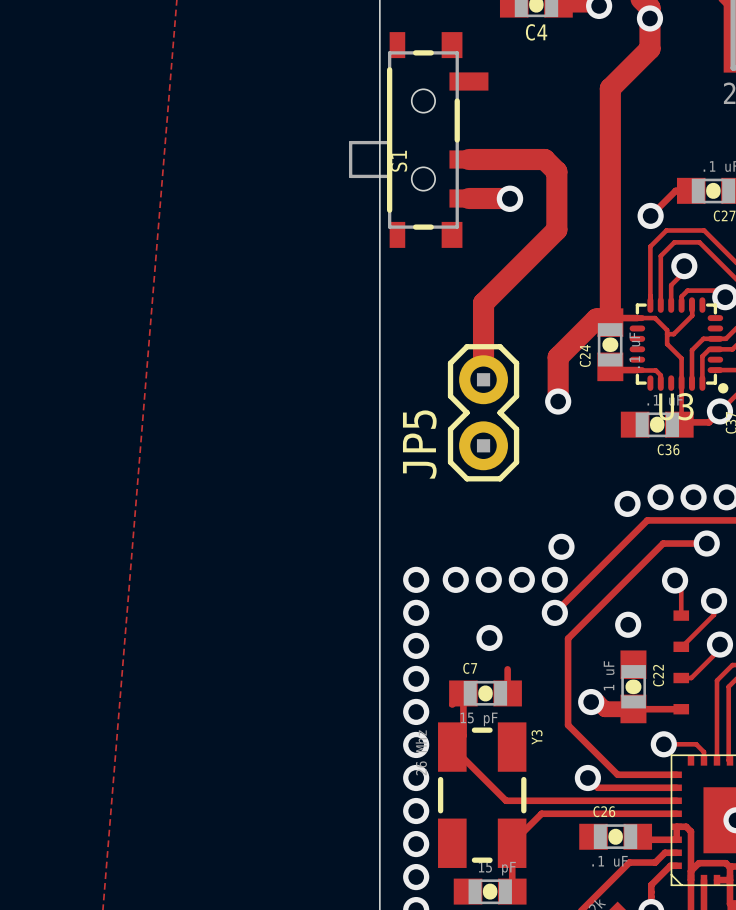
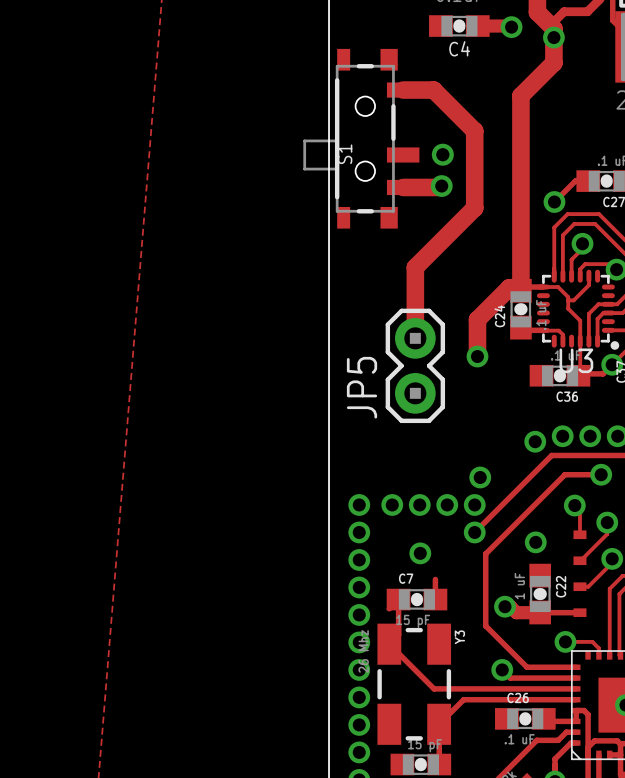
track: (468, 159) (544, 159) (556, 171) (556, 229) (483, 303) -> (403, 90) (433, 90) (474, 131) (474, 208) (415, 267) (415, 274)
via: none -> (441, 186)
via position: (509, 198) -> (442, 154)

